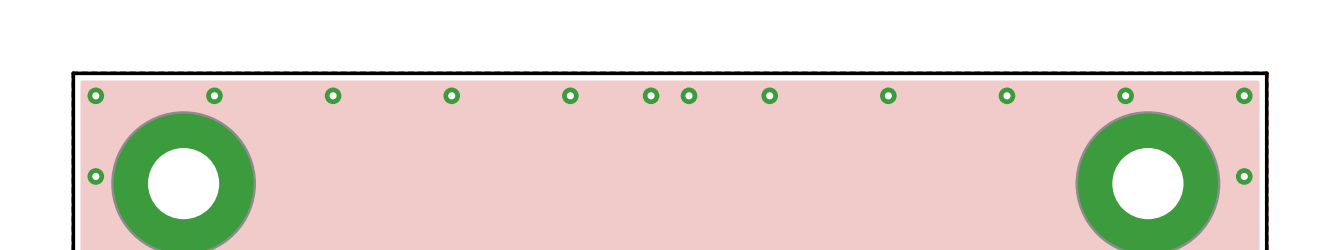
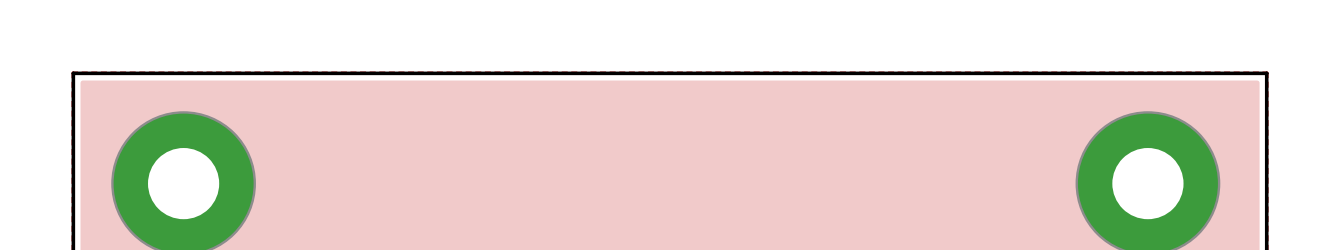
via: (95, 95) -> none
via: (214, 95) -> none
via: (333, 95) -> none
via: (451, 95) -> none
via: (570, 95) -> none
via: (651, 95) -> none
via: (689, 95) -> none
via: (769, 95) -> none
via: (888, 95) -> none
via: (1006, 95) -> none
via: (1125, 95) -> none
via: (1244, 95) -> none
via: (95, 176) -> none
via: (1244, 176) -> none

